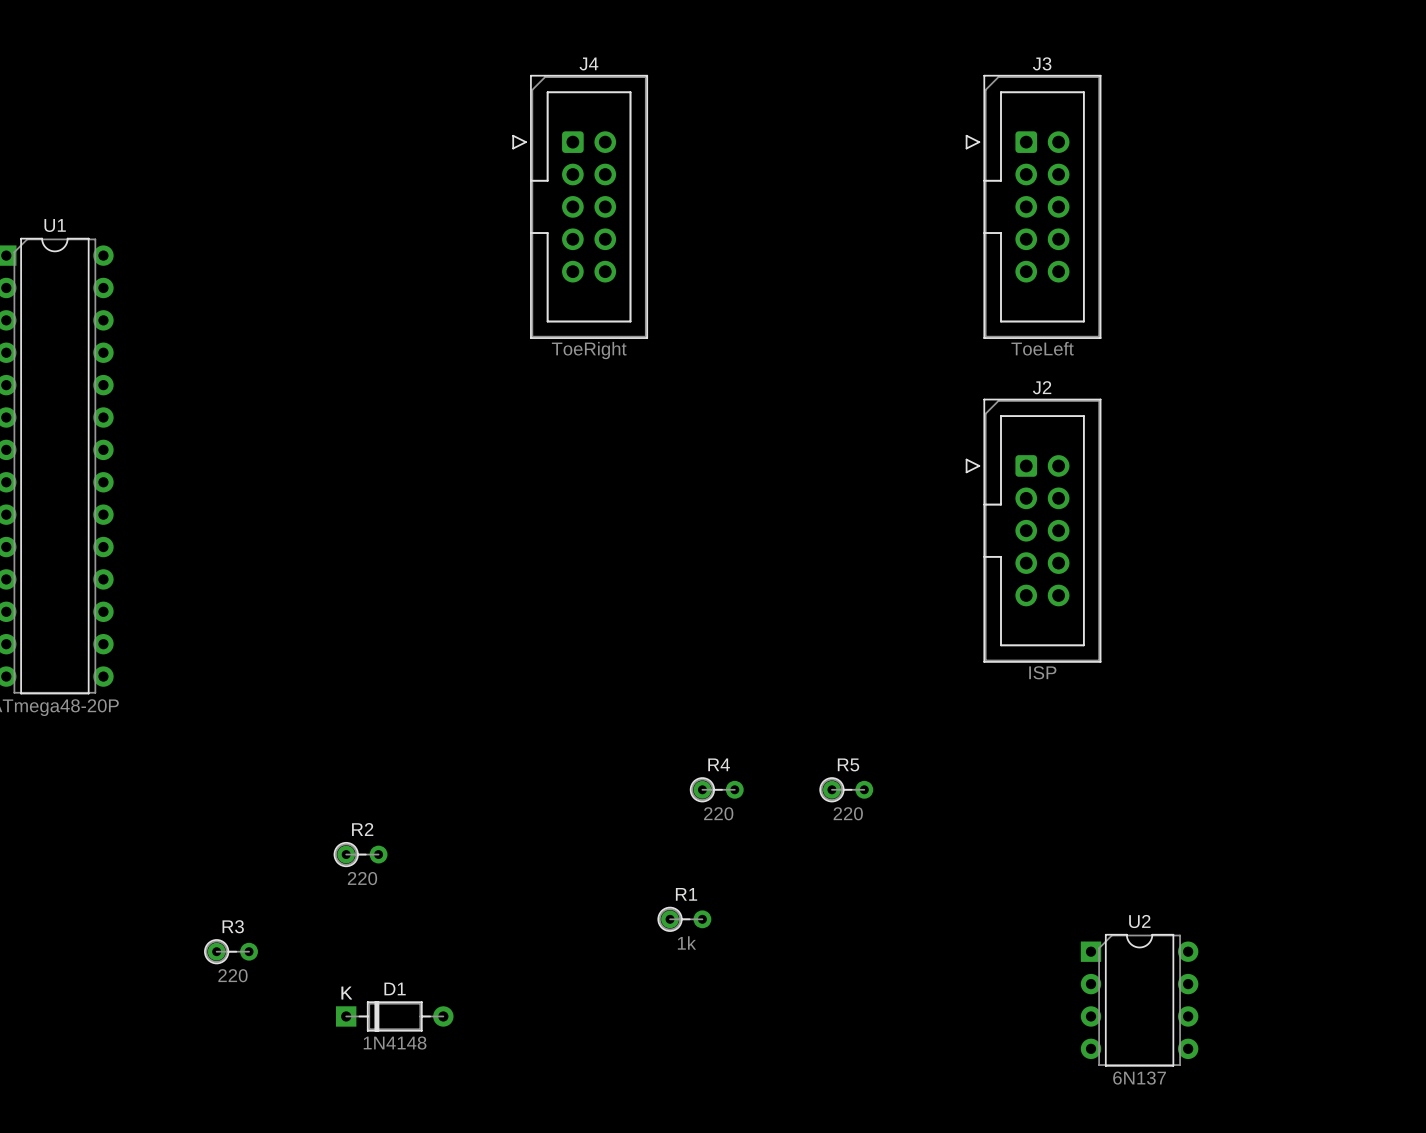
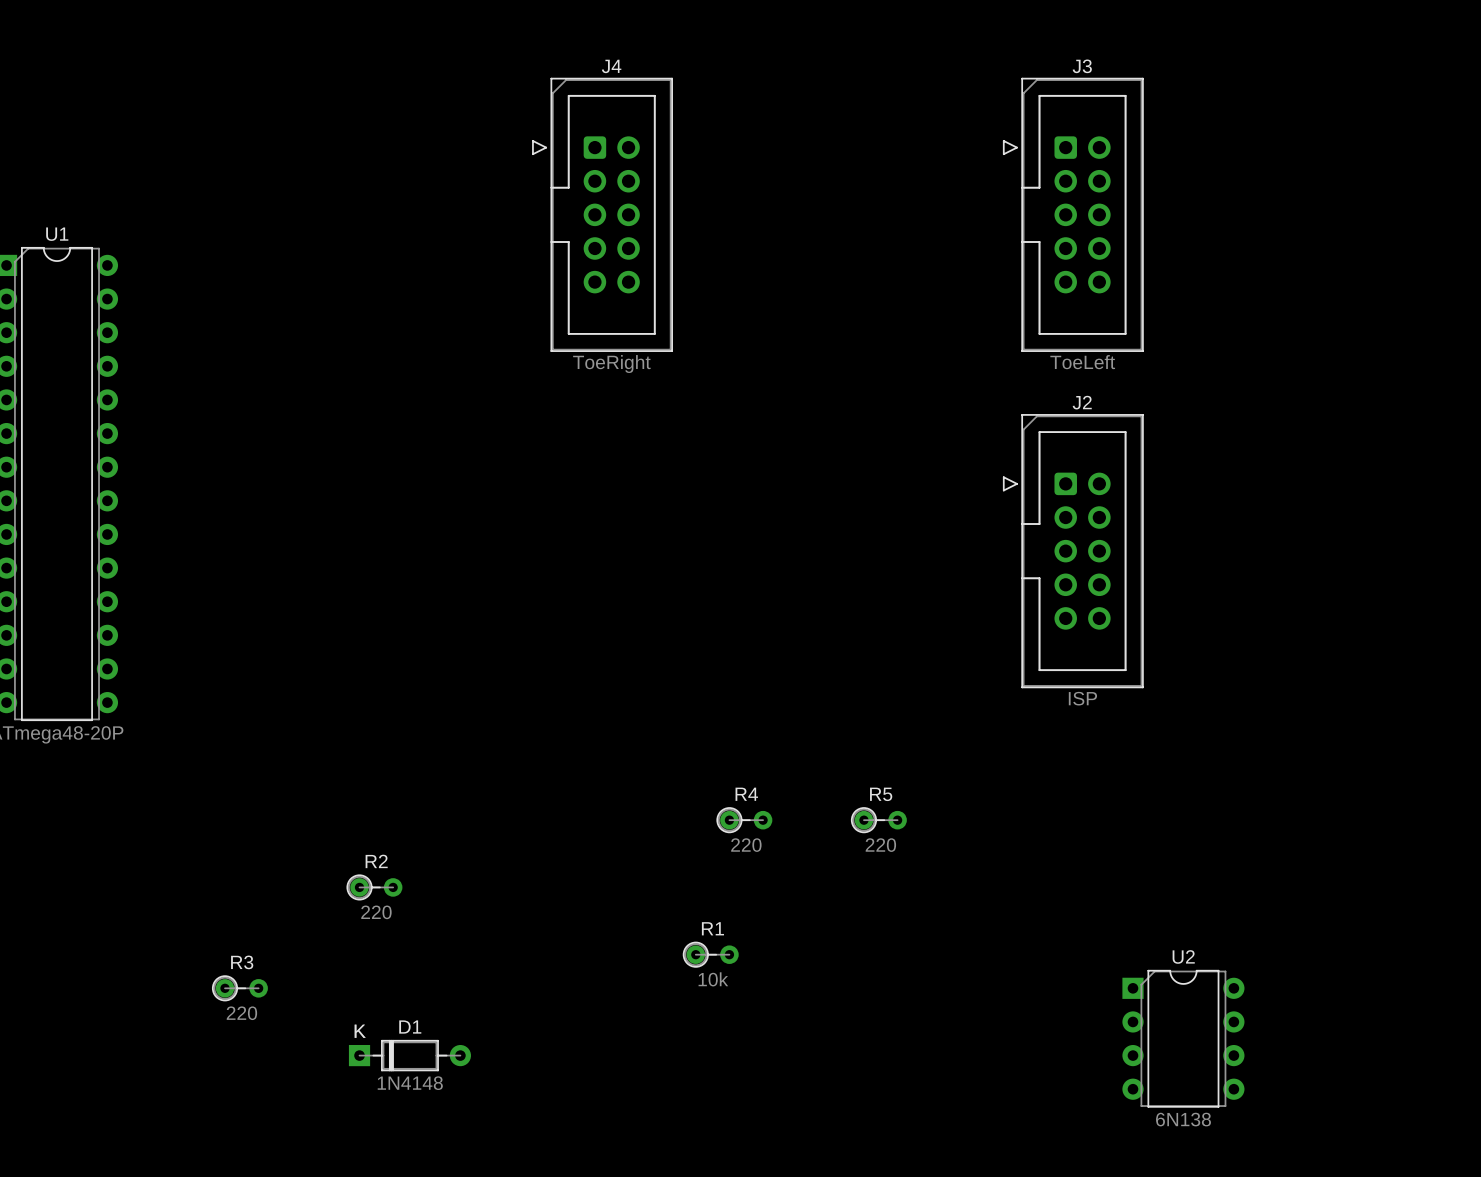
R1 value: 1k (686, 942) -> 10k (713, 979)
U2 value: 6N137 (1139, 1078) -> 6N138 (1183, 1119)

